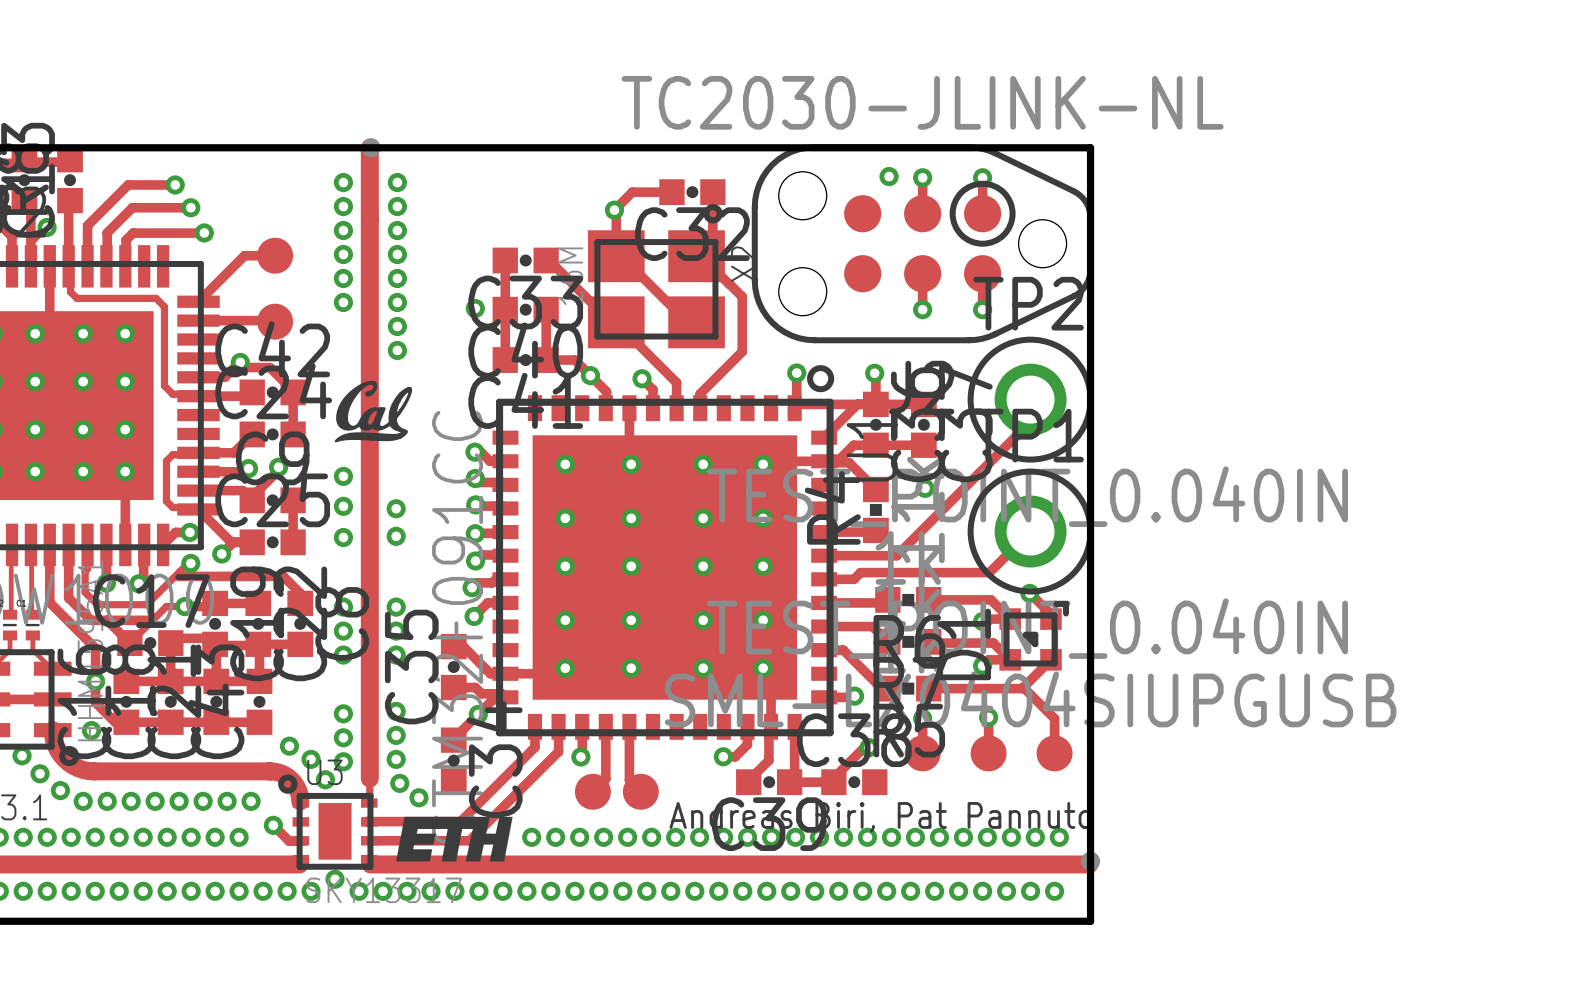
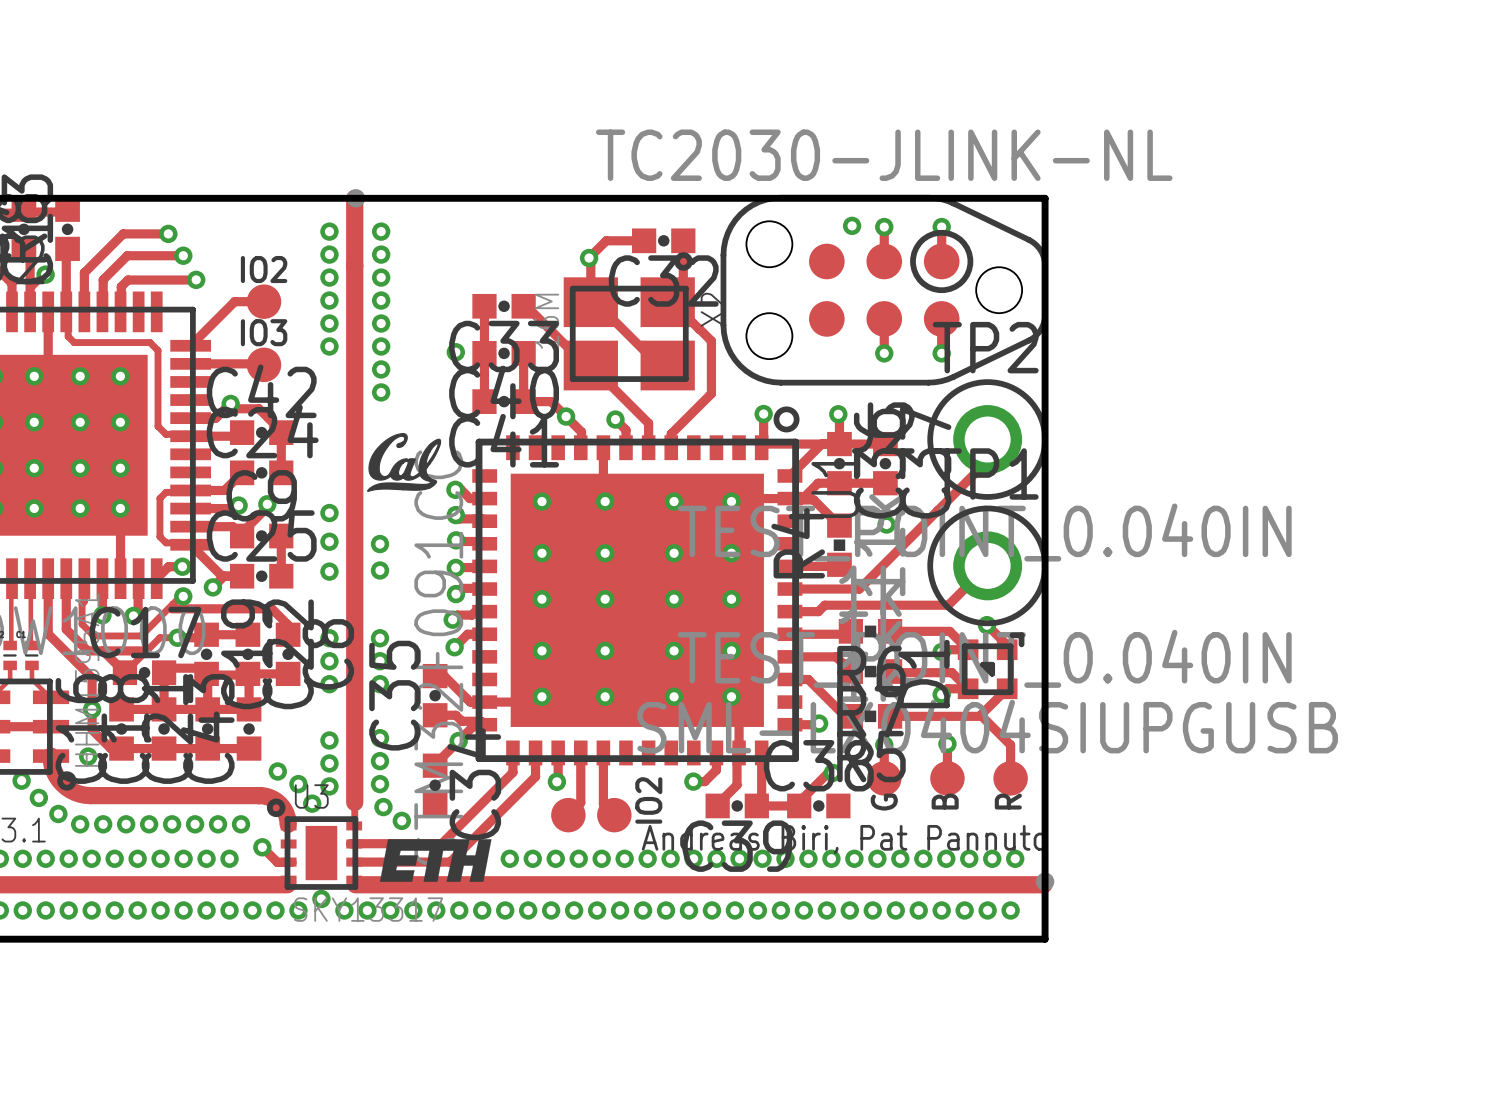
text: none -> IO2 (264, 269)
text: none -> IO3 (264, 332)
drawing position: (373, 411) -> (404, 462)
text: none -> IO2 (648, 800)
text: none -> B (945, 801)
text: none -> R (1008, 801)
text: none -> G (884, 802)

